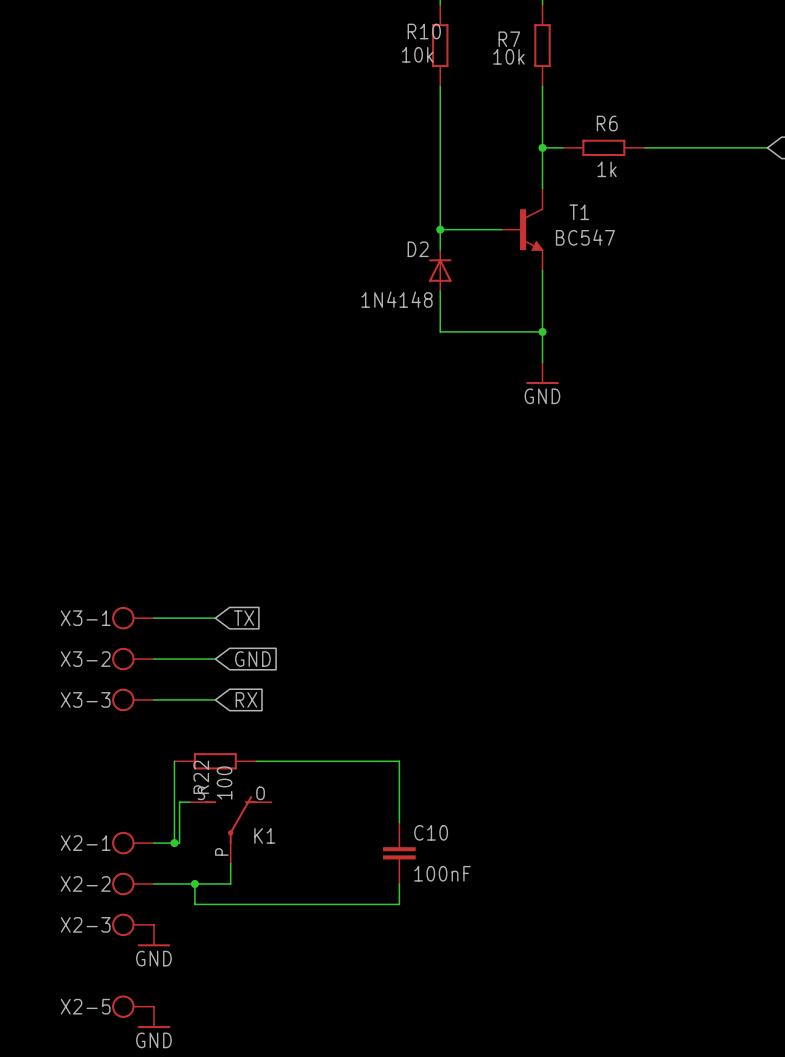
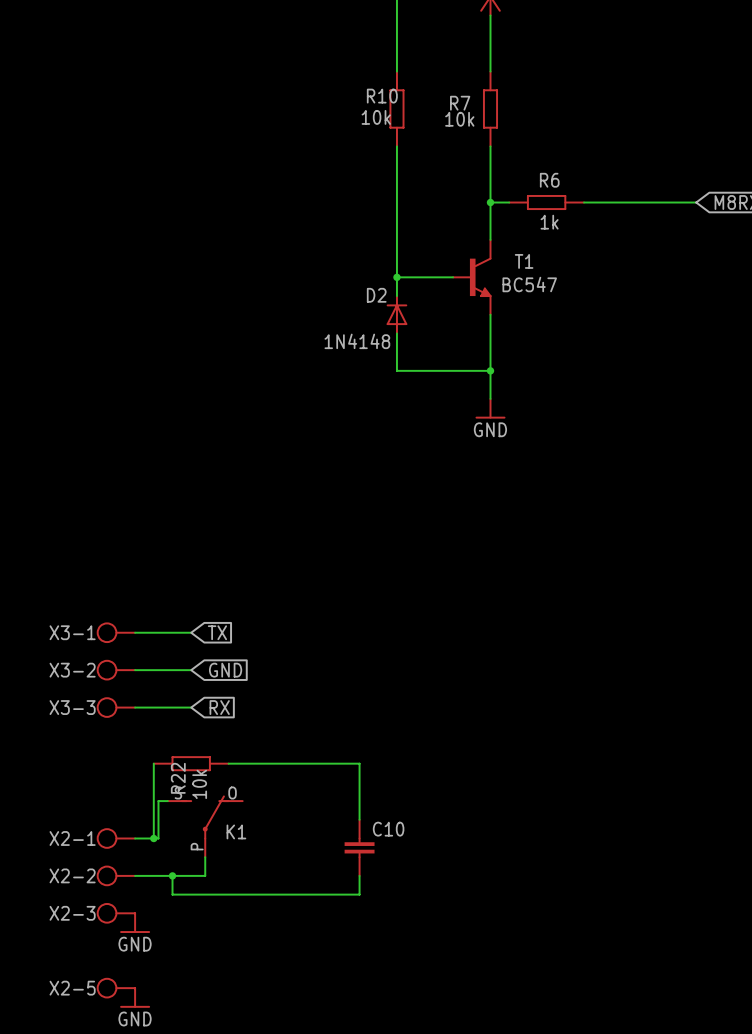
R22 value: 100 (224, 783) -> 10k (199, 784)
C10 value: 100nF (442, 873) -> none

